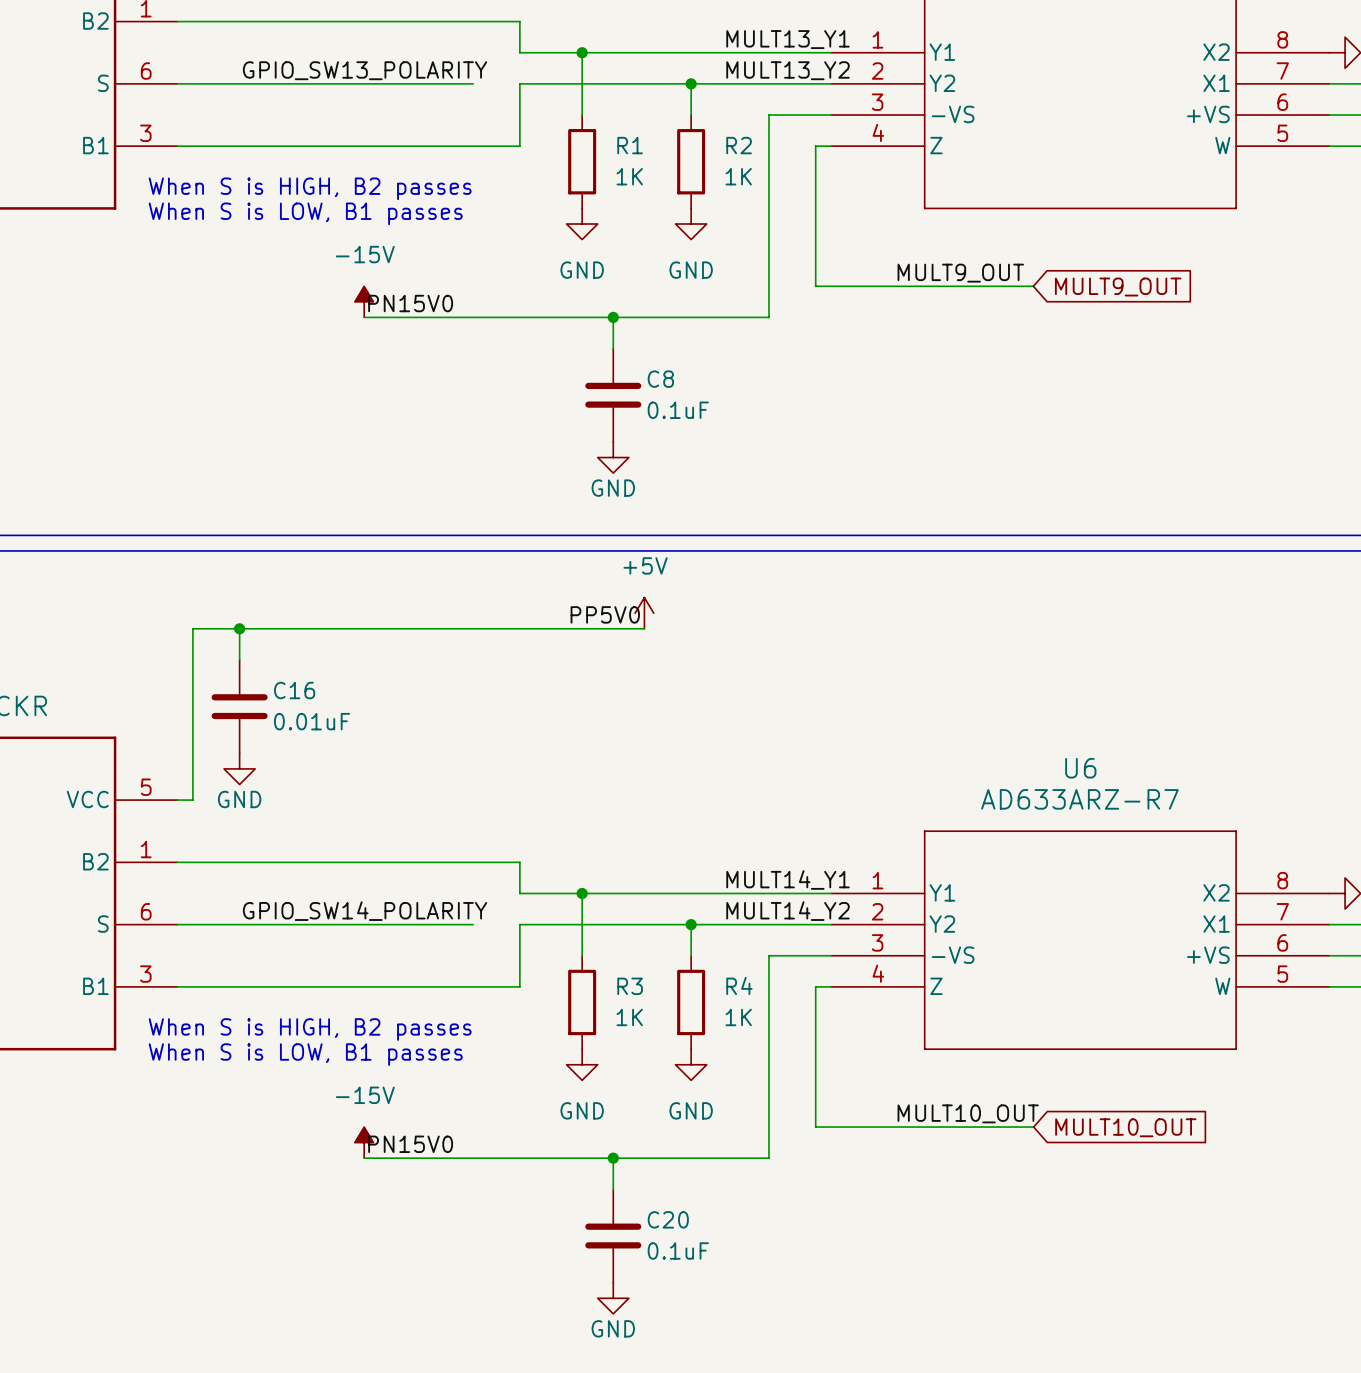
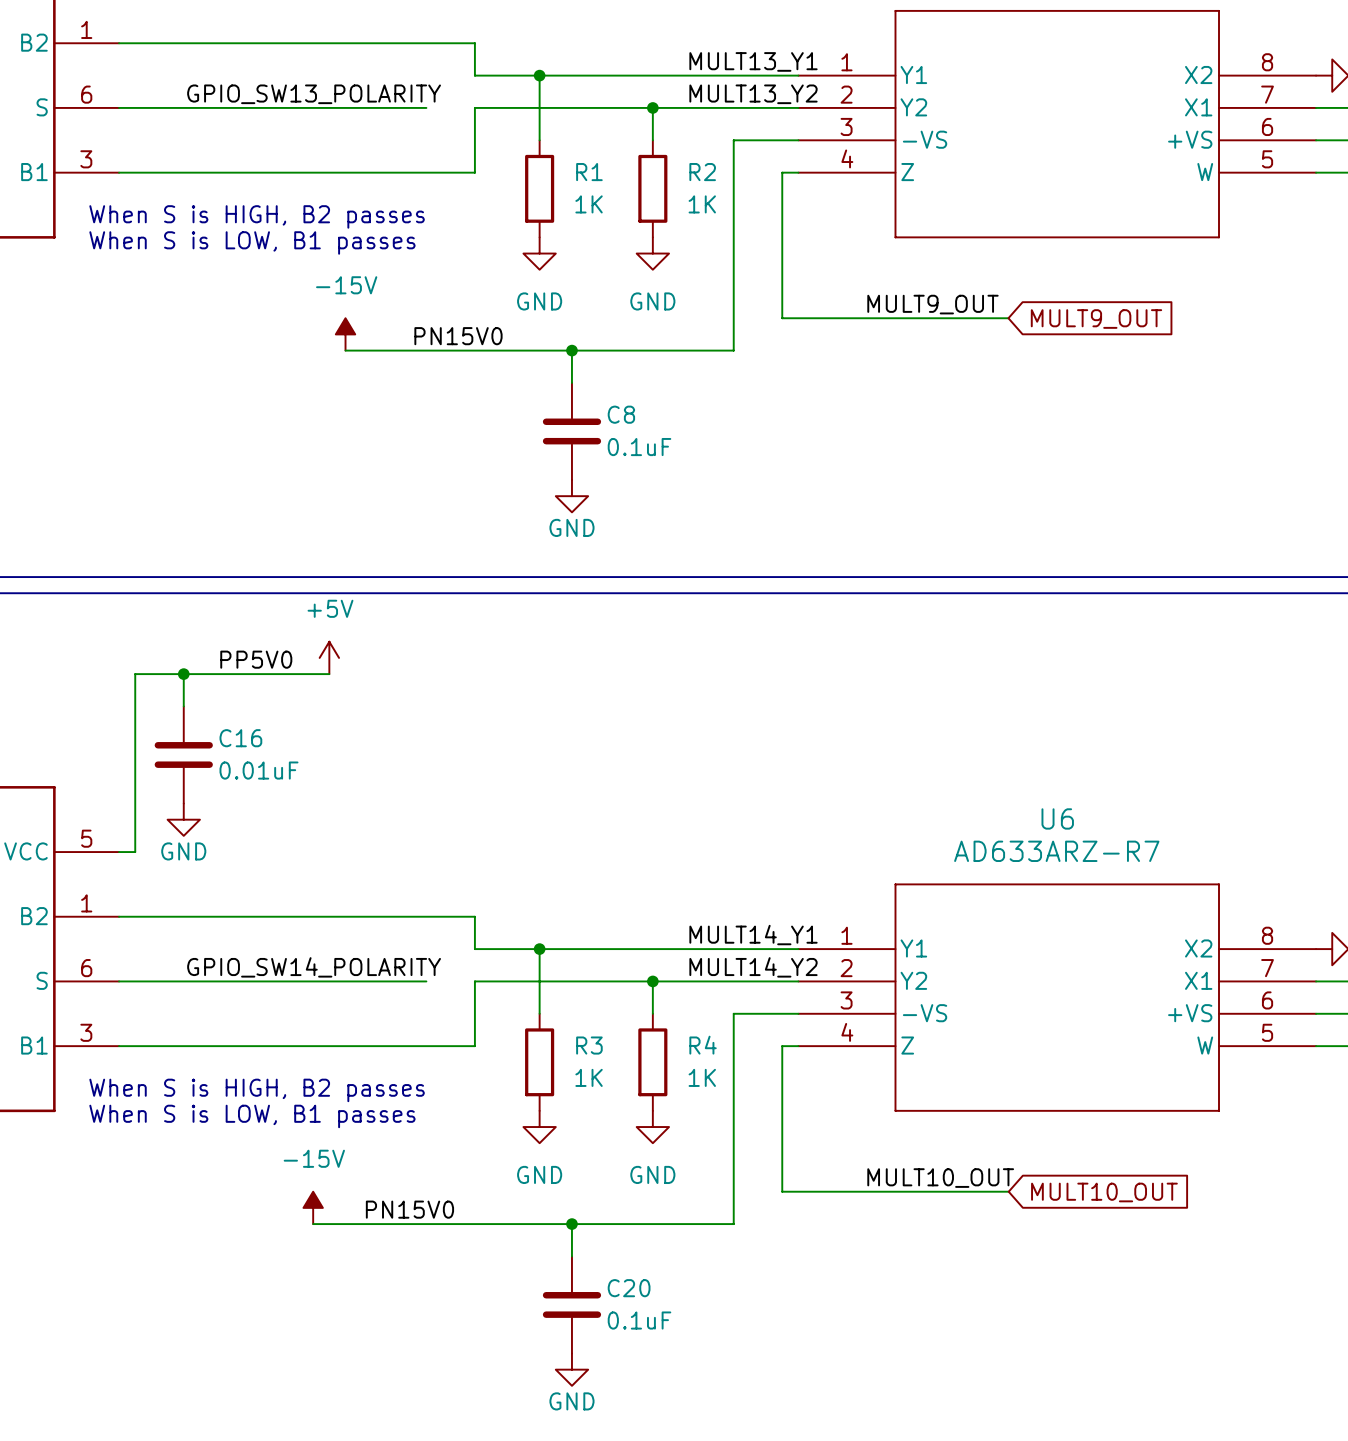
power symbol position: -15V (364, 301) -> -15V (345, 334)
label position: PN15V0 (410, 303) -> PN15V0 (458, 336)
wire: (364, 317) (395, 317) -> none
power symbol position: +5V (644, 613) -> +5V (329, 657)
label position: PP5V0 (605, 614) -> PP5V0 (256, 659)
wire: (379, 628) (644, 628) -> none
label position: PN15V0 (410, 1144) -> PN15V0 (409, 1209)

